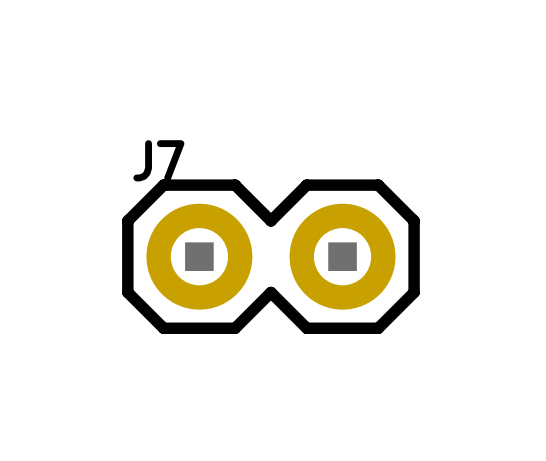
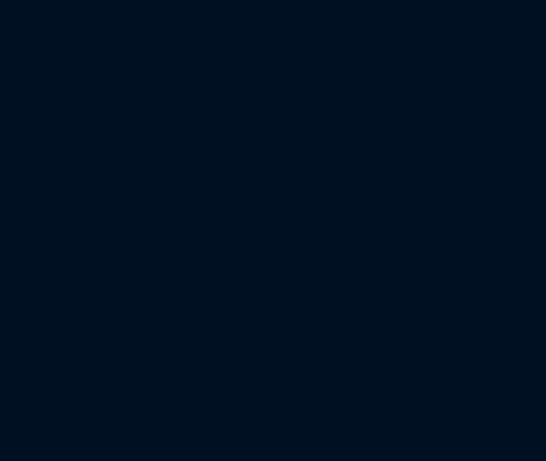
J7: (270, 256) -> none

